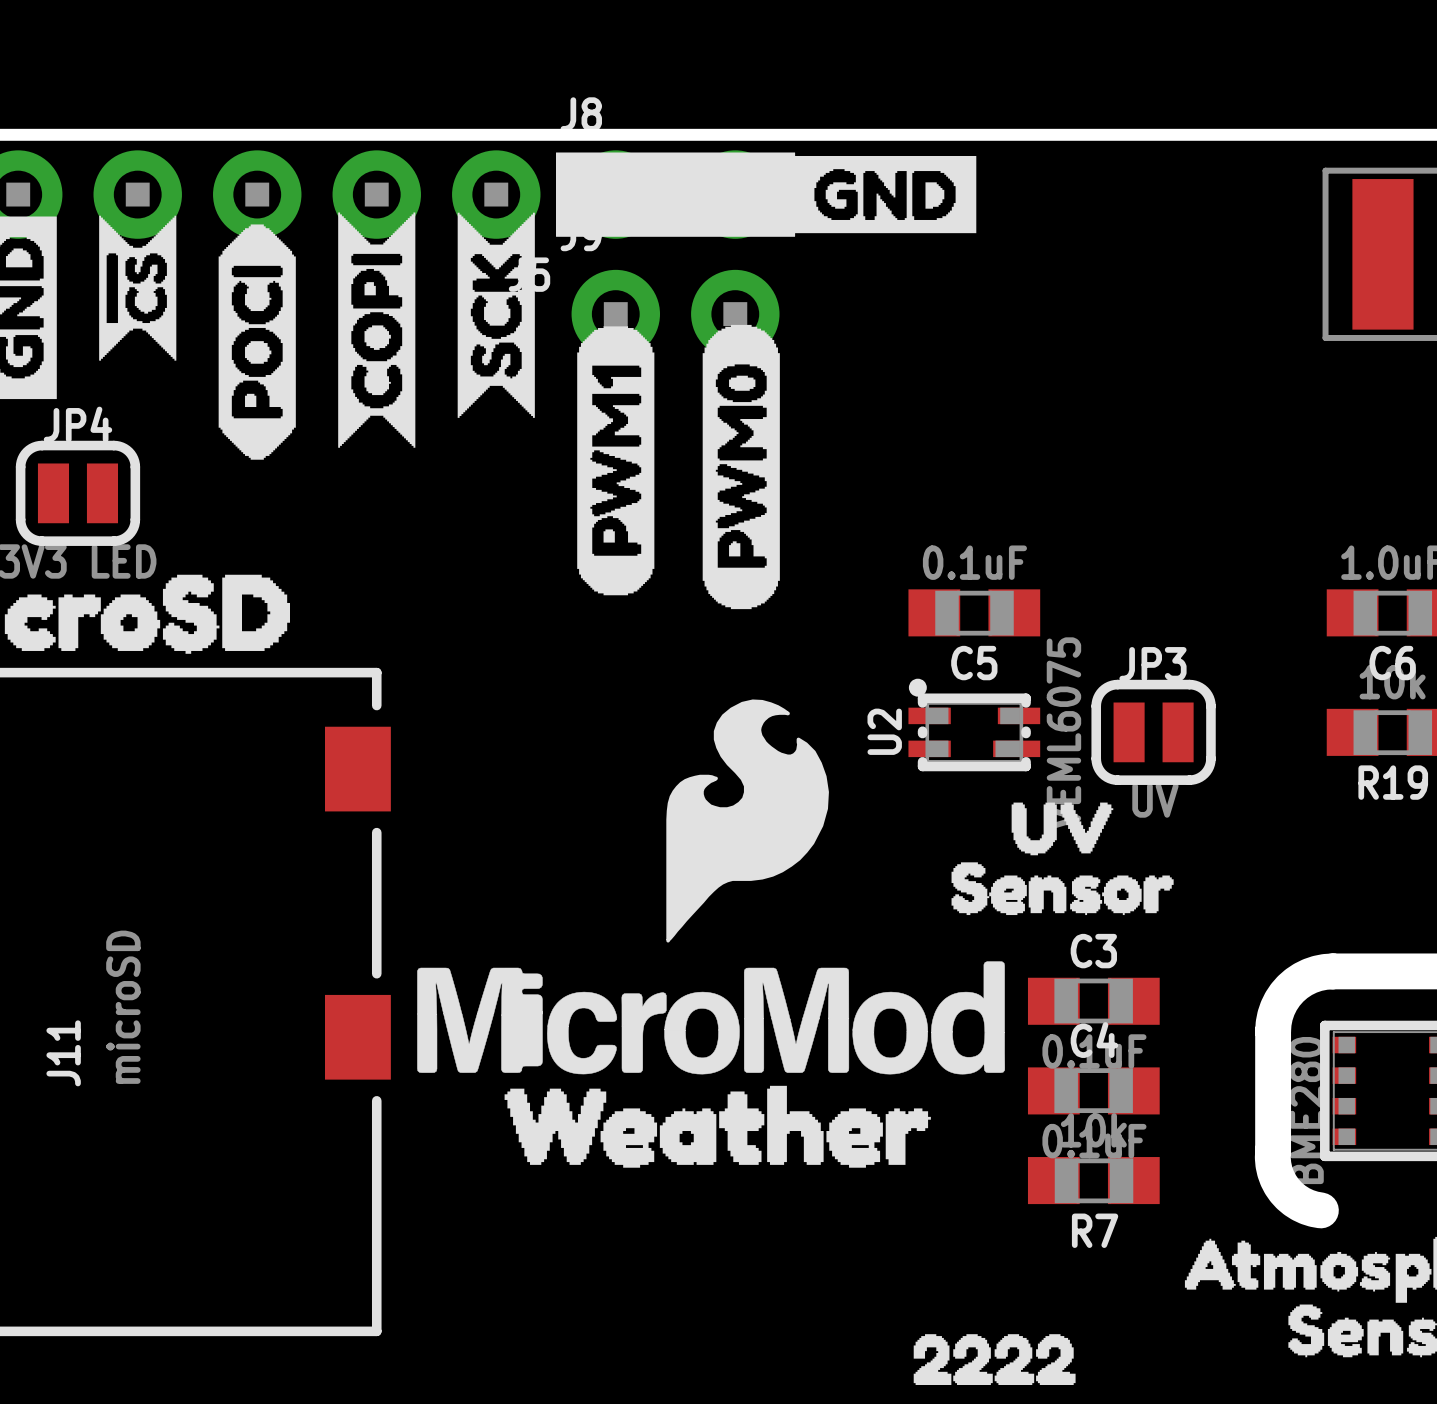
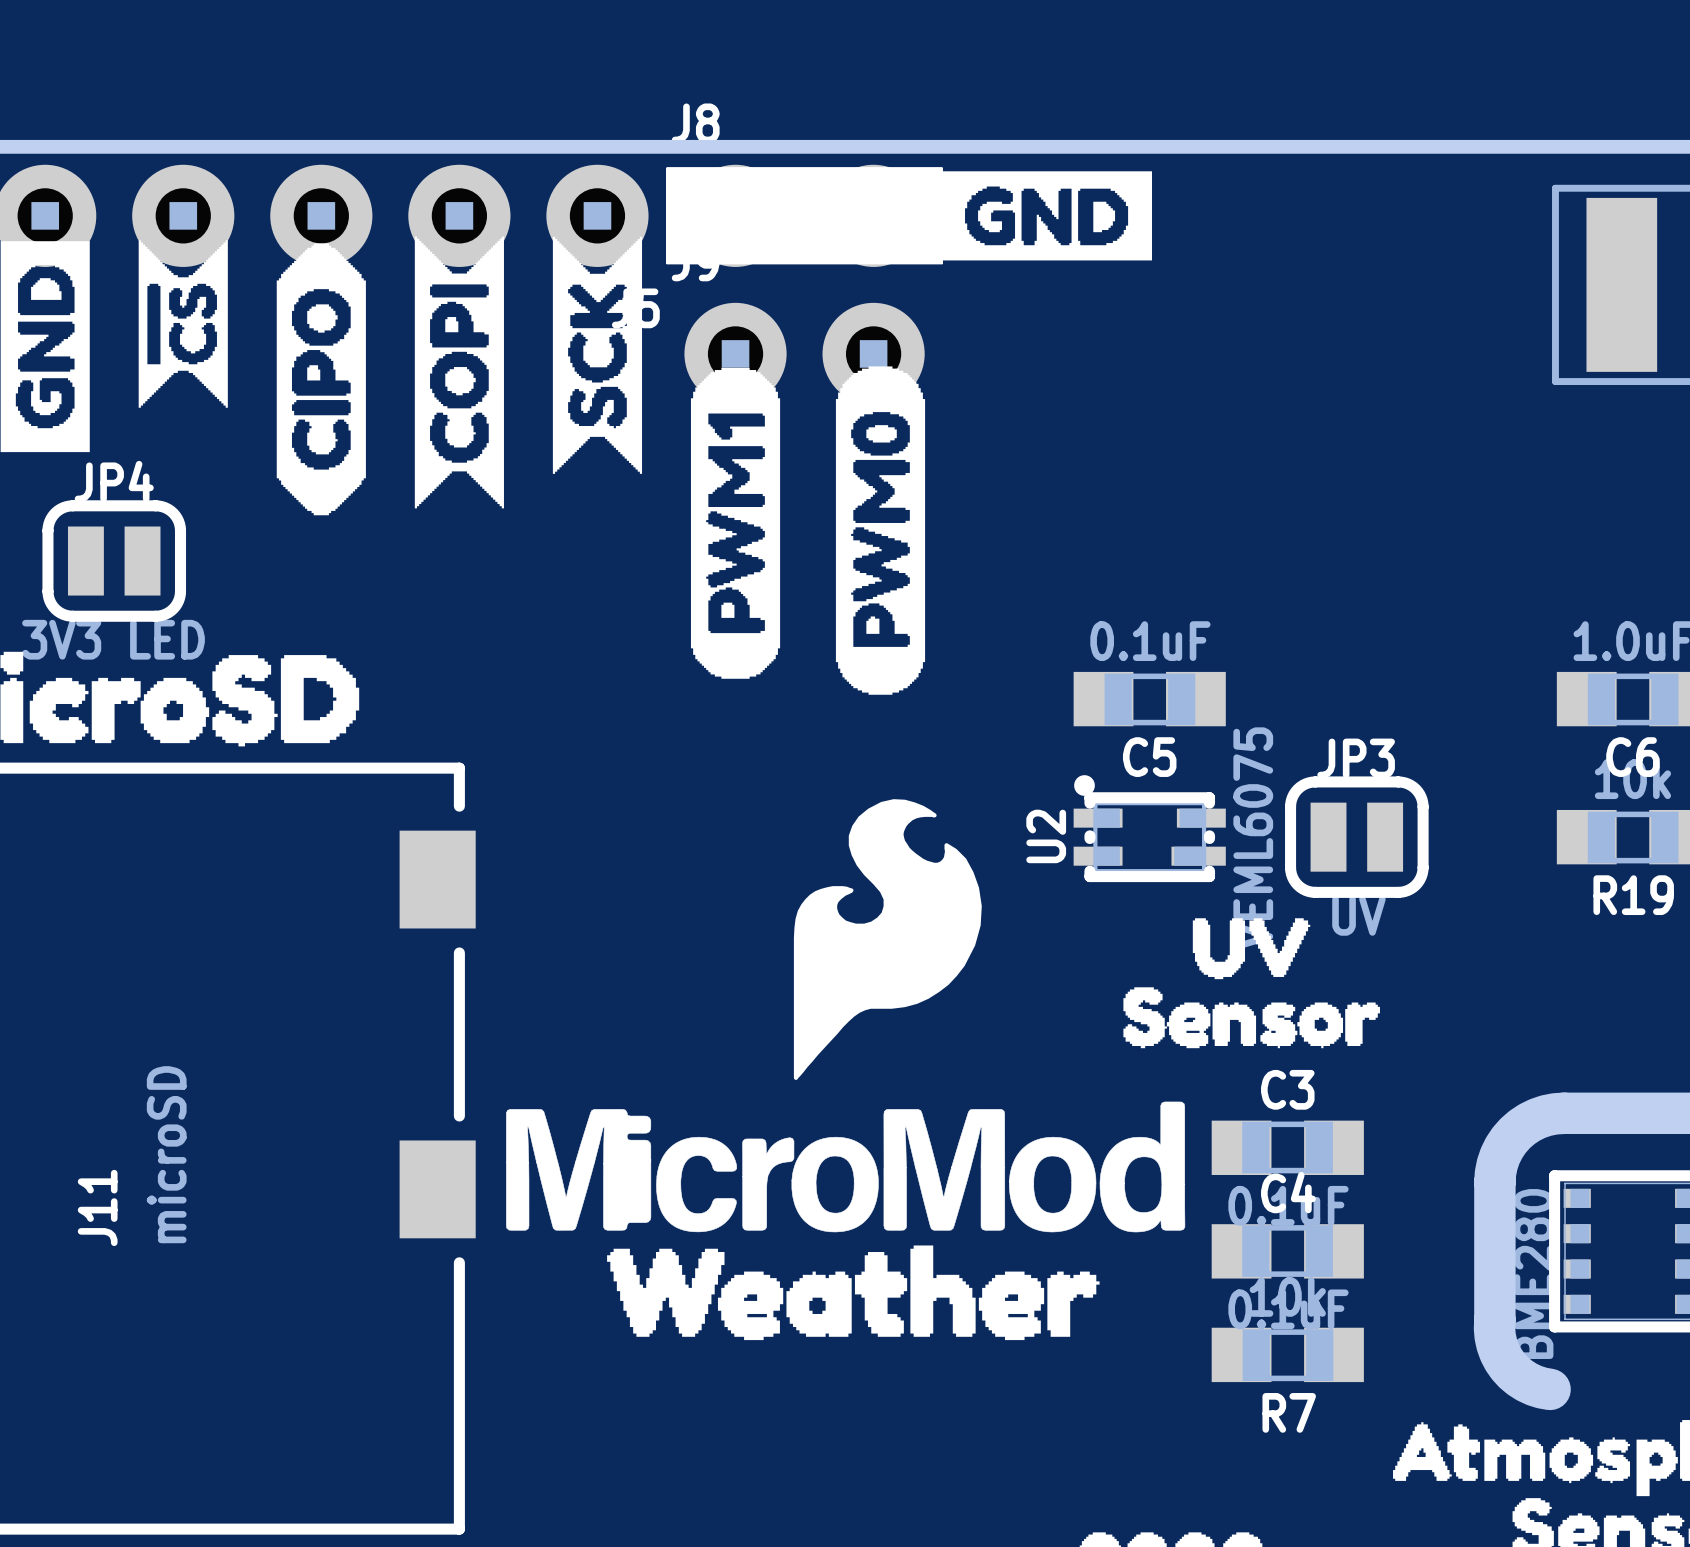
drawing shape: [218, 224, 296, 460] -> [276, 243, 366, 516]

